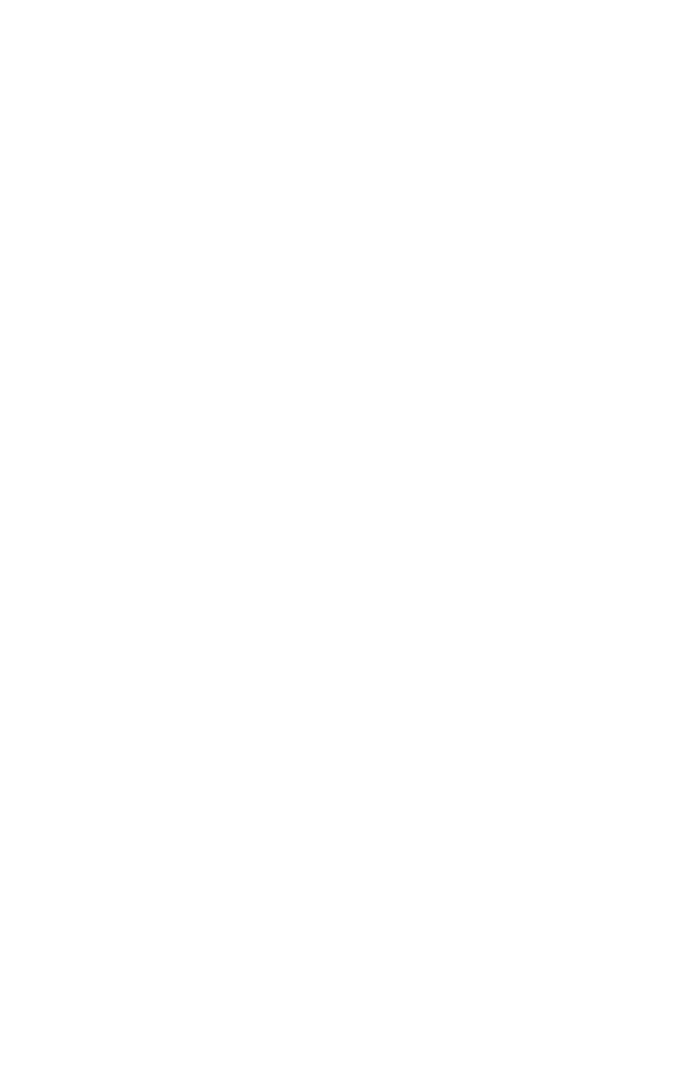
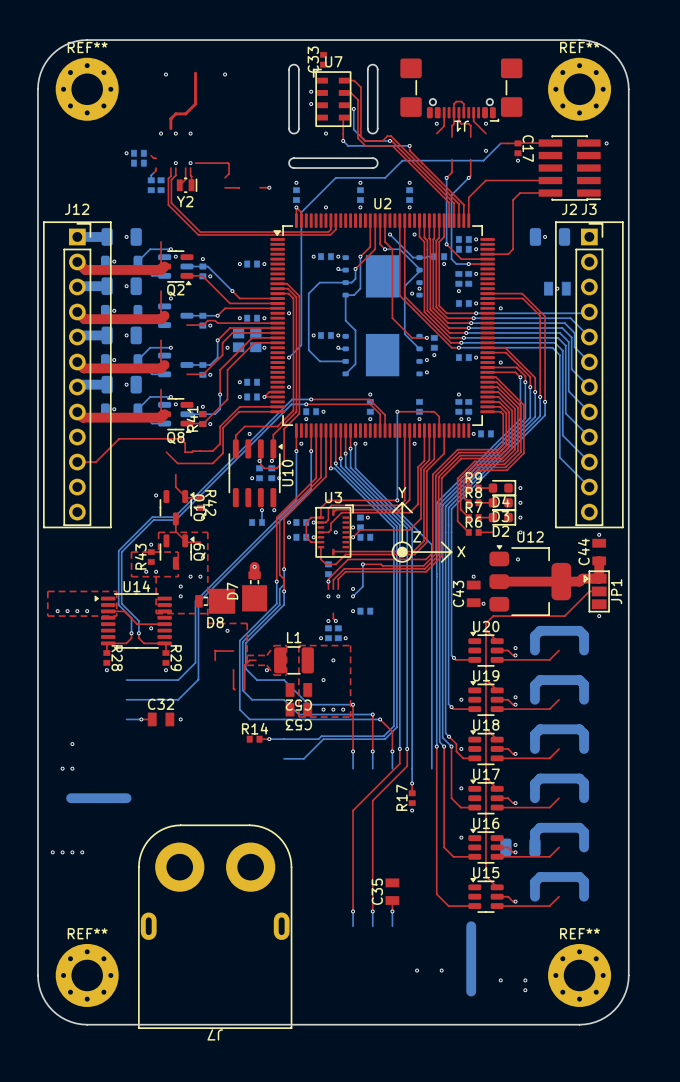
board edge: none -> (87, 40) (579, 40) (590, 41) (605, 47) (618, 58) (623, 67) (628, 89) (628, 975) (627, 986) (621, 1001) (614, 1010) (600, 1019) (579, 1024) (87, 1024) (70, 1021) (61, 1017) (52, 1010) (42, 996) (37, 975) (37, 89) (40, 73) (52, 54) (70, 42) (87, 40)
C33: none -> (323, 59)
board edge: none -> (289, 69) (289, 129) (294, 133) (298, 129) (298, 68) (293, 64) (289, 69)
board edge: none -> (367, 69) (367, 129) (373, 133) (377, 129) (377, 68) (372, 64) (367, 69)
top track: none -> (195, 73) (195, 104) (185, 113) (175, 113) (170, 118) (170, 128)
via: none -> (165, 74)
via: none -> (225, 74)
top track: none -> (344, 80) (354, 80) (360, 87) (360, 136) (365, 140) (382, 140) (387, 136) (391, 136) (458, 203) (458, 220)
REF**: none -> (87, 89)
REF**: none -> (579, 89)
J1: none -> (461, 90)
via: none -> (311, 91)
top track: none -> (344, 92) (351, 92) (357, 99) (357, 138) (365, 145) (392, 145) (449, 202) (449, 220)
U7: none -> (332, 97)
via: none -> (311, 104)
bottom track: none -> (353, 108) (353, 129) (365, 140) (389, 140)
via: none -> (353, 108)
top track: none -> (444, 112) (444, 126) (436, 133)
top track: none -> (458, 112) (458, 121) (470, 125) (470, 137)
top track: none -> (463, 112) (463, 104) (461, 101) (456, 101) (453, 104) (452, 137)
top track: none -> (473, 112) (473, 121) (485, 133)
top track: none -> (344, 117) (343, 140)
via: none -> (436, 123)
via: none -> (485, 123)
via: none -> (161, 133)
via: none -> (175, 133)
via: none -> (190, 133)
via: none -> (325, 133)
bottom track: none -> (343, 140) (348, 145) (409, 145)
via: none -> (343, 140)
top track: none -> (389, 140) (453, 203) (453, 220)
via: none -> (389, 140)
bottom track: none -> (500, 143) (483, 160) (402, 160) (385, 177) (335, 177) (301, 212) (301, 345) (289, 357)
top track: none -> (550, 143) (500, 143)
via: none -> (606, 143)
top track: none -> (409, 145) (409, 150) (463, 204) (463, 220)
via: none -> (409, 145)
C17: none -> (517, 148)
via: none -> (485, 150)
via: none -> (126, 153)
part: none -> (138, 153)
top track: none -> (151, 155) (156, 158)
board edge: none -> (293, 158) (372, 158) (377, 163) (372, 168) (293, 168) (289, 163) (293, 158)
top track: none -> (452, 159) (452, 172) (446, 177)
top track: none -> (470, 159) (470, 175) (468, 177)
via: none -> (517, 160)
part: none -> (138, 163)
via: none -> (175, 163)
via: none -> (190, 163)
top track: none -> (195, 163) (228, 163) (228, 173) (225, 177)
top track: none -> (156, 168) (153, 172)
top track: none -> (170, 168) (170, 176) (168, 178) (168, 204) (198, 234) (330, 234) (335, 229) (335, 220)
top track: none -> (175, 168) (175, 175) (171, 179) (171, 202) (200, 232) (328, 232) (330, 229) (330, 220)
top track: none -> (185, 168) (185, 179) (179, 185)
top track: none -> (190, 168) (191, 185)
J2: none -> (569, 168)
bottom track: none -> (153, 172) (151, 175) (151, 180)
bottom track: none -> (446, 177) (446, 244)
via: none -> (446, 177)
bottom track: none -> (468, 177) (451, 195) (451, 259) (456, 264) (468, 264)
via: none -> (468, 177)
top track: none -> (550, 180) (485, 180) (468, 197) (468, 220)
via: none -> (296, 182)
via: none -> (360, 182)
via: none -> (409, 182)
part: none -> (151, 185)
part: none -> (161, 185)
Y2: none -> (186, 185)
top track: none -> (225, 187) (239, 187)
top track: none -> (260, 187) (269, 187)
via: none -> (269, 187)
top track: none -> (550, 193) (520, 193) (513, 200) (513, 249) (508, 254) (487, 254)
part: none -> (296, 195)
part: none -> (360, 195)
part: none -> (409, 195)
via: none -> (296, 207)
via: none -> (325, 207)
via: none -> (360, 207)
via: none -> (409, 207)
top track: none -> (296, 220) (296, 207) (301, 212) (301, 220)
top track: none -> (370, 220) (370, 246) (360, 256)
top track: none -> (375, 220) (375, 249) (355, 268)
top track: none -> (380, 220) (380, 244) (385, 249)
top track: none -> (385, 220) (385, 241) (392, 249) (392, 318) (412, 337) (426, 337)
top track: none -> (399, 220) (399, 295) (451, 347) (458, 347)
top track: none -> (404, 220) (404, 296) (451, 342) (461, 342)
top track: none -> (419, 220) (419, 236) (424, 241) (424, 312) (450, 337) (463, 337)
top track: none -> (424, 220) (424, 237) (427, 240) (427, 310) (449, 332) (466, 332)
top track: none -> (429, 220) (430, 309) (448, 328) (468, 328)
top track: none -> (434, 220) (433, 308) (448, 323) (471, 323)
top track: none -> (439, 220) (439, 237) (436, 240) (436, 307) (447, 318) (473, 318)
top track: none -> (444, 220) (444, 236) (439, 241) (439, 305) (446, 313) (476, 313)
line: none -> (43, 222) (110, 222) (110, 527) (43, 527) (43, 222)
line: none -> (555, 222) (622, 222) (622, 527) (555, 527) (555, 222)
bottom track: none -> (389, 234) (413, 257) (434, 256)
via: none -> (389, 234)
via: none -> (414, 234)
bottom track: none -> (77, 236) (107, 236)
part: none -> (121, 236)
via: none -> (126, 236)
via: none -> (545, 236)
part: none -> (549, 236)
part: none -> (463, 239)
via: none -> (476, 239)
top track: none -> (161, 241) (161, 262) (164, 266) (161, 269) (85, 269) (77, 261)
top track: none -> (446, 244) (461, 259) (487, 259)
via: none -> (446, 244)
bottom track: none -> (170, 249) (150, 249) (137, 261) (152, 275) (164, 275)
via: none -> (170, 249)
bottom track: none -> (385, 249) (399, 249) (419, 268) (419, 271) (404, 286) (404, 334) (419, 348)
via: none -> (385, 249)
part: none -> (463, 249)
via: none -> (476, 249)
via: none -> (175, 256)
via: none -> (313, 256)
part: none -> (325, 256)
via: none -> (338, 256)
bottom track: none -> (360, 256) (360, 288) (353, 295) (345, 295) (345, 320) (355, 330) (355, 364) (345, 373)
via: none -> (360, 256)
part: none -> (439, 256)
via: none -> (202, 259)
via: none -> (114, 261)
part: none -> (121, 261)
via: none -> (239, 264)
part: none -> (252, 264)
via: none -> (264, 264)
via: none -> (444, 264)
top track: none -> (468, 264) (487, 264)
via: none -> (468, 264)
part: none -> (175, 266)
bottom track: none -> (187, 266) (207, 266) (232, 291)
Q2: none -> (175, 267)
bottom track: none -> (338, 268) (345, 270)
via: none -> (338, 268)
bottom track: none -> (355, 268) (355, 278) (351, 282) (319, 282) (308, 293) (308, 350) (319, 361) (345, 361)
via: none -> (355, 268)
part: none -> (202, 271)
via: none -> (476, 273)
top track: none -> (187, 275) (202, 275) (229, 303) (277, 303)
via: none -> (210, 276)
part: none -> (382, 276)
part: none -> (458, 278)
part: none -> (468, 278)
top track: none -> (277, 283) (287, 283) (299, 296) (299, 413) (284, 428) (284, 460) (276, 468) (264, 468) (260, 464) (260, 448)
bottom track: none -> (107, 286) (77, 286)
part: none -> (121, 286)
via: none -> (126, 286)
top track: none -> (277, 288) (287, 288) (296, 297) (296, 411) (273, 434) (271, 460)
via: none -> (419, 288)
part: none -> (557, 288)
via: none -> (557, 288)
top track: none -> (161, 291) (161, 312) (164, 315) (161, 319) (84, 319) (77, 312)
top track: none -> (232, 291) (239, 298) (277, 298)
via: none -> (232, 291)
via: none -> (458, 291)
top track: none -> (277, 293) (288, 293) (293, 298) (293, 410) (277, 426) (244, 426) (235, 435) (235, 448)
via: none -> (412, 293)
top track: none -> (487, 293) (522, 293) (545, 316) (545, 401)
via: none -> (170, 298)
top track: none -> (487, 298) (522, 298) (540, 315) (540, 396)
part: none -> (463, 303)
via: none -> (476, 303)
top track: none -> (277, 308) (225, 308) (217, 315)
via: none -> (500, 308)
via: none -> (114, 310)
part: none -> (121, 310)
bottom track: none -> (589, 312) (476, 313)
via: none -> (289, 313)
via: none -> (476, 313)
part: none -> (175, 315)
bottom track: none -> (187, 315) (217, 315)
via: none -> (217, 315)
via: none -> (239, 318)
part: none -> (252, 318)
via: none -> (264, 318)
bottom track: none -> (473, 318) (570, 318) (589, 337)
via: none -> (473, 318)
part: none -> (202, 320)
top track: none -> (277, 323) (217, 323) (215, 320) (207, 320) (202, 325) (187, 325)
bottom track: none -> (471, 323) (564, 323) (574, 332) (574, 347) (589, 362)
via: none -> (471, 323)
via: none -> (210, 325)
U2: none -> (382, 325)
top track: none -> (277, 328) (229, 328) (217, 340)
bottom track: none -> (468, 328) (562, 328) (571, 337) (571, 369) (589, 387)
via: none -> (468, 328)
top track: none -> (277, 332) (232, 332) (222, 342) (222, 355) (202, 374) (187, 374)
bottom track: none -> (466, 332) (559, 332) (568, 341) (568, 391) (589, 412)
via: none -> (466, 332)
bottom track: none -> (107, 335) (77, 337)
part: none -> (121, 335)
via: none -> (126, 335)
via: none -> (313, 335)
part: none -> (325, 335)
via: none -> (338, 335)
top track: none -> (277, 337) (252, 337) (220, 369) (220, 394)
via: none -> (426, 337)
bottom track: none -> (463, 337) (557, 337) (565, 345) (565, 413) (589, 437)
via: none -> (463, 337)
top track: none -> (161, 340) (161, 361) (164, 364) (161, 368) (83, 368) (77, 362)
bottom track: none -> (217, 340) (217, 357) (210, 364) (187, 364)
via: none -> (217, 340)
part: none -> (247, 340)
top track: none -> (277, 342) (254, 342) (227, 369) (227, 399) (202, 424) (187, 423)
part: none -> (434, 342)
bottom track: none -> (461, 342) (554, 342) (562, 350) (562, 435) (589, 462)
via: none -> (461, 342)
bottom track: none -> (170, 347) (150, 347) (137, 360) (152, 374) (164, 374)
via: none -> (170, 347)
via: none -> (227, 347)
via: none -> (264, 347)
bottom track: none -> (338, 347) (345, 348)
via: none -> (338, 347)
bottom track: none -> (458, 347) (552, 347) (559, 355) (559, 457) (589, 487)
via: none -> (458, 347)
top track: none -> (487, 347) (505, 347) (535, 377) (535, 392)
top track: none -> (487, 352) (505, 352) (530, 377) (530, 387)
part: none -> (382, 355)
via: none -> (434, 355)
via: none -> (289, 357)
part: none -> (463, 357)
via: none -> (476, 357)
via: none -> (114, 360)
part: none -> (121, 360)
via: none -> (426, 360)
via: none -> (500, 362)
part: none -> (175, 364)
top track: none -> (487, 367) (516, 367) (525, 376) (525, 382)
part: none -> (202, 369)
via: none -> (426, 372)
top track: none -> (487, 372) (515, 372) (520, 377)
J12: none -> (77, 374)
via: none -> (210, 374)
J3: none -> (589, 374)
top track: none -> (487, 377) (496, 377) (523, 405) (523, 453) (506, 470) (479, 470) (468, 480) (468, 488)
bottom track: none -> (520, 377) (520, 419) (436, 502) (436, 746)
via: none -> (520, 377)
via: none -> (239, 382)
part: none -> (252, 382)
top track: none -> (487, 382) (496, 382) (520, 406) (520, 452) (505, 467) (477, 467) (463, 480) (463, 497) (468, 502)
bottom track: none -> (525, 382) (525, 418) (439, 504) (439, 742) (444, 746)
via: none -> (525, 382)
bottom track: none -> (107, 384) (79, 384) (77, 387)
part: none -> (121, 384)
via: none -> (126, 384)
via: none -> (289, 387)
top track: none -> (487, 387) (497, 387) (517, 407) (517, 450) (504, 464) (475, 464) (460, 479) (460, 509) (468, 517)
bottom track: none -> (530, 387) (530, 417) (442, 505) (442, 737) (451, 746)
via: none -> (530, 387)
top track: none -> (161, 389) (161, 410) (164, 414) (161, 417) (82, 417) (77, 412)
top track: none -> (277, 392) (269, 392) (264, 396) (277, 396)
top track: none -> (487, 392) (498, 392) (515, 408) (515, 449) (503, 461) (474, 461) (457, 478) (457, 521) (468, 532)
bottom track: none -> (535, 392) (535, 416) (445, 506) (445, 733) (449, 736)
via: none -> (535, 392)
bottom track: none -> (220, 394) (220, 409) (215, 414) (187, 414)
via: none -> (220, 394)
via: none -> (370, 394)
via: none -> (458, 394)
bottom track: none -> (170, 396) (150, 396) (137, 409) (152, 423) (164, 423)
via: none -> (170, 396)
via: none -> (239, 396)
part: none -> (252, 396)
via: none -> (264, 396)
top track: none -> (487, 396) (498, 396) (512, 410) (512, 448) (501, 458) (461, 458) (441, 478) (441, 556) (426, 571) (345, 571) (338, 579) (338, 589)
bottom track: none -> (540, 396) (540, 416) (448, 507) (448, 704) (451, 707)
via: none -> (540, 396)
top track: none -> (311, 399) (369, 399) (385, 414) (385, 430)
bottom track: none -> (311, 399) (292, 399) (174, 517) (152, 517) (118, 550) (118, 604) (131, 617) (131, 633)
via: none -> (311, 399)
top track: none -> (487, 401) (499, 401) (509, 411) (509, 447) (500, 455) (460, 455) (438, 476) (438, 555) (424, 568) (344, 568) (333, 579) (333, 589)
bottom track: none -> (545, 401) (545, 415) (451, 508) (451, 655) (453, 657)
via: none -> (545, 401)
via: none -> (175, 404)
top track: none -> (306, 404) (370, 404) (380, 414) (380, 430)
bottom track: none -> (306, 404) (291, 404) (175, 520) (153, 520) (121, 552) (121, 603) (138, 620) (138, 633)
via: none -> (306, 404)
via: none -> (202, 406)
top track: none -> (277, 406) (239, 406) (220, 426) (220, 443) (212, 451) (185, 452) (185, 443) (180, 438) (119, 438) (95, 462) (77, 462)
part: none -> (370, 406)
part: none -> (419, 406)
part: none -> (458, 406)
part: none -> (468, 406)
top track: none -> (487, 406) (500, 406) (506, 412) (506, 445) (499, 452) (458, 452) (435, 475) (435, 553) (423, 565) (362, 564)
via: none -> (114, 409)
part: none -> (121, 409)
top track: none -> (277, 411) (239, 411) (223, 427) (223, 453) (212, 463) (177, 463) (166, 452)
part: none -> (311, 411)
via: none -> (323, 411)
top track: none -> (397, 411) (434, 411) (439, 416) (439, 430)
bottom track: none -> (397, 411) (397, 500)
via: none -> (397, 411)
top track: none -> (487, 411) (500, 411) (503, 414) (503, 444) (498, 449) (457, 449) (432, 474) (432, 552) (425, 559) (348, 559) (328, 579) (328, 589)
part: none -> (175, 414)
Q8: none -> (175, 415)
R41: none -> (202, 419)
via: none -> (306, 419)
via: none -> (370, 419)
via: none -> (419, 419)
via: none -> (461, 419)
via: none -> (468, 419)
via: none -> (210, 424)
top track: none -> (296, 430) (296, 451)
top track: none -> (311, 430) (311, 451)
top track: none -> (316, 430) (316, 478) (276, 517) (276, 581)
top track: none -> (321, 430) (321, 477) (279, 518) (279, 574) (284, 579) (284, 591)
top track: none -> (325, 430) (325, 476) (284, 518) (284, 569)
top track: none -> (330, 430) (330, 468)
top track: none -> (335, 430) (335, 463)
top track: none -> (340, 430) (340, 458)
top track: none -> (345, 430) (345, 453)
top track: none -> (350, 430) (350, 448)
top track: none -> (404, 430) (404, 500) (399, 505) (331, 505) (328, 508) (328, 519) (325, 522) (313, 522)
top track: none -> (409, 430) (409, 499) (399, 509) (336, 509) (333, 512)
top track: none -> (424, 430) (424, 460) (418, 467) (418, 504) (409, 512) (341, 512) (330, 523) (330, 529) (328, 532) (320, 532)
top track: none -> (429, 430) (429, 460) (421, 468) (421, 518) (409, 529) (360, 529) (353, 537) (345, 537)
top track: none -> (434, 430) (434, 459) (423, 469) (423, 540) (413, 551) (333, 552)
top track: none -> (444, 430) (444, 453) (426, 470) (426, 542) (414, 554) (345, 554) (335, 564) (325, 564) (320, 559) (320, 547)
via: none -> (249, 433)
via: none -> (473, 433)
part: none -> (485, 433)
via: none -> (301, 443)
bottom track: none -> (355, 443) (355, 468) (431, 544) (431, 768)
via: none -> (355, 443)
via: none -> (365, 443)
via: none -> (414, 443)
bottom track: none -> (350, 448) (350, 467) (412, 529) (412, 783)
via: none -> (350, 448)
bottom track: none -> (296, 451) (296, 500) (195, 601) (195, 662) (178, 680) (126, 680)
via: none -> (296, 451)
bottom track: none -> (311, 451) (311, 489) (198, 602) (198, 679) (178, 699) (126, 699)
via: none -> (311, 451)
bottom track: none -> (345, 453) (345, 466) (407, 528) (407, 748)
via: none -> (345, 453)
bottom track: none -> (340, 458) (340, 466) (399, 525) (399, 748)
via: none -> (340, 458)
via: none -> (259, 460)
via: none -> (271, 460)
bottom track: none -> (335, 463) (396, 526) (396, 727) (385, 739) (323, 739) (303, 758) (284, 758)
via: none -> (335, 463)
bottom track: none -> (330, 468) (334, 468) (393, 527) (393, 726) (383, 736) (321, 736) (318, 739) (269, 739)
via: none -> (330, 468)
U10: none -> (255, 473)
part: none -> (259, 473)
part: none -> (271, 473)
top track: none -> (175, 474) (175, 487) (186, 497) (200, 497)
via: none -> (252, 478)
via: none -> (279, 478)
R9: none -> (473, 488)
top track: none -> (478, 488) (493, 488)
D4: none -> (502, 488)
via: none -> (520, 488)
via: none -> (156, 495)
top track: none -> (397, 500) (328, 500) (320, 507) (320, 517) (311, 517) (306, 522) (306, 537) (311, 542) (320, 542)
via: none -> (397, 500)
R42: none -> (200, 502)
drawing: none -> [391, 502, 453, 563]
R8: none -> (473, 502)
top track: none -> (478, 502) (493, 502)
D3: none -> (502, 502)
via: none -> (520, 502)
Q10: none -> (177, 507)
bottom track: none -> (261, 510) (261, 522)
via: none -> (261, 510)
via: none -> (274, 510)
via: none -> (367, 517)
R7: none -> (473, 517)
top track: none -> (478, 517) (493, 517)
D2: none -> (502, 517)
via: none -> (520, 517)
top track: none -> (175, 518) (175, 531) (186, 542) (200, 542)
part: none -> (257, 522)
via: none -> (289, 522)
part: none -> (301, 522)
via: none -> (313, 522)
part: none -> (360, 522)
via: none -> (353, 527)
U3: none -> (334, 531)
via: none -> (335, 532)
R6: none -> (473, 532)
top track: none -> (478, 532) (493, 532)
via: none -> (520, 532)
via: none -> (599, 534)
via: none -> (289, 537)
part: none -> (301, 537)
via: none -> (313, 537)
via: none -> (353, 537)
part: none -> (365, 537)
via: none -> (151, 544)
top zone outline: none -> (131, 552) (178, 552) (178, 576) (131, 576) (131, 552)
top zone outline: none -> (158, 552) (158, 532) (207, 532) (207, 623) (247, 623) (247, 665) (266, 665) (274, 675) (286, 675) (286, 645) (274, 645) (266, 655) (247, 655)
Q9: none -> (177, 552)
C44: none -> (599, 552)
R43: none -> (151, 556)
via: none -> (517, 559)
top track: none -> (599, 560) (599, 578) (582, 578) (579, 581) (499, 581)
bottom track: none -> (362, 564) (362, 586) (353, 596)
via: none -> (362, 564)
top track: none -> (254, 566) (254, 575)
via: none -> (254, 566)
bottom track: none -> (284, 569) (284, 584) (279, 588) (279, 604) (242, 641) (242, 690) (252, 699) (284, 699) (298, 714) (372, 714)
via: none -> (284, 569)
part: none -> (328, 569)
via: none -> (146, 571)
via: none -> (156, 571)
top zone outline: none -> (156, 576) (156, 613) (207, 613)
via: none -> (190, 576)
via: none -> (200, 576)
via: none -> (473, 576)
U12: none -> (530, 580)
bottom track: none -> (276, 581) (276, 603) (239, 640) (239, 709) (249, 719) (380, 719)
via: none -> (276, 581)
via: none -> (328, 581)
via: none -> (180, 586)
via: none -> (353, 588)
top zone outline: none -> (47, 591) (116, 591) (116, 616) (47, 616) (47, 591)
D7: none -> (254, 591)
bottom track: none -> (284, 591) (284, 604) (245, 643) (245, 668) (257, 680) (284, 680) (308, 704) (353, 704)
via: none -> (284, 591)
JP1: none -> (596, 591)
top track: none -> (599, 591) (589, 591) (564, 616) (493, 616) (485, 623) (485, 876) (497, 887)
C43: none -> (473, 593)
via: none -> (180, 596)
via: none -> (328, 596)
via: none -> (338, 596)
via: none -> (353, 596)
D8: none -> (215, 601)
via: none -> (483, 603)
via: none -> (57, 611)
via: none -> (67, 611)
via: none -> (77, 611)
via: none -> (87, 611)
top track: none -> (108, 611) (124, 611) (137, 624) (164, 624)
via: none -> (353, 611)
part: none -> (365, 611)
top track: none -> (333, 613) (333, 618) (335, 620)
via: none -> (599, 616)
U14: none -> (133, 620)
via: none -> (328, 620)
via: none -> (335, 620)
via: none -> (151, 628)
top track: none -> (485, 629) (497, 641)
via: none -> (227, 630)
top track: none -> (131, 633) (131, 638) (126, 643) (108, 643) (106, 652)
via: none -> (131, 633)
top track: none -> (138, 633) (138, 638) (144, 643) (164, 643) (165, 652)
via: none -> (138, 633)
part: none -> (328, 633)
part: none -> (338, 633)
via: none -> (321, 638)
via: none -> (345, 638)
top zone outline: none -> (298, 645) (350, 645) (350, 716) (298, 716) (298, 645)
via: none -> (515, 648)
U20: none -> (485, 649)
top track: none -> (497, 650) (508, 650) (515, 655)
bottom track: none -> (534, 650) (534, 636) (540, 630) (579, 630) (584, 635) (584, 650)
top track: none -> (559, 650) (549, 659) (497, 659)
top track: none -> (233, 651) (215, 650) (215, 660)
via: none -> (515, 655)
R28: none -> (106, 657)
R29: none -> (165, 657)
top track: none -> (453, 657) (455, 659) (474, 659)
via: none -> (453, 657)
top track: none -> (255, 660) (249, 660) (244, 665) (244, 689)
L1: none -> (293, 660)
via: none -> (333, 660)
top track: none -> (233, 669) (234, 689)
via: none -> (106, 670)
via: none -> (165, 670)
via: none -> (266, 670)
top track: none -> (485, 679) (497, 690)
via: none -> (323, 680)
C52: none -> (298, 689)
via: none -> (515, 697)
U19: none -> (485, 698)
via: none -> (461, 699)
top track: none -> (497, 699) (508, 699) (515, 704)
bottom track: none -> (534, 699) (534, 685) (540, 680) (579, 680) (584, 684) (584, 699)
top track: none -> (559, 699) (549, 709) (497, 709)
top track: none -> (353, 704) (353, 751)
via: none -> (353, 704)
via: none -> (515, 704)
top track: none -> (451, 707) (453, 709) (474, 709)
via: none -> (451, 707)
C53: none -> (298, 709)
via: none -> (323, 709)
via: none -> (333, 709)
via: none -> (343, 709)
top track: none -> (372, 714) (372, 751)
via: none -> (372, 714)
bottom track: none -> (126, 719) (141, 719)
top track: none -> (141, 719) (152, 719)
via: none -> (141, 719)
C32: none -> (161, 719)
via: none -> (180, 719)
top track: none -> (380, 719) (392, 731) (392, 751)
via: none -> (380, 719)
top track: none -> (485, 728) (497, 739)
top track: none -> (449, 736) (456, 744) (456, 751) (463, 758) (474, 758)
via: none -> (449, 736)
R14: none -> (254, 739)
top track: none -> (259, 739) (269, 739)
via: none -> (269, 739)
via: none -> (72, 744)
top track: none -> (436, 746) (436, 894) (448, 906) (474, 906)
via: none -> (436, 746)
top track: none -> (444, 746) (444, 847) (453, 856) (474, 856)
via: none -> (444, 746)
top track: none -> (451, 746) (451, 798) (460, 807) (474, 807)
via: none -> (451, 746)
U18: none -> (485, 747)
top track: none -> (399, 748) (399, 763) (353, 810) (353, 911)
via: none -> (399, 748)
top track: none -> (407, 748) (407, 766) (372, 800) (372, 911)
via: none -> (407, 748)
via: none -> (461, 748)
top track: none -> (497, 748) (508, 748) (515, 753)
bottom track: none -> (534, 748) (534, 734) (540, 729) (579, 729) (584, 733) (584, 748)
top track: none -> (559, 748) (549, 758) (497, 758)
bottom track: none -> (353, 751) (353, 768)
via: none -> (353, 751)
bottom track: none -> (372, 751) (372, 768)
via: none -> (372, 751)
bottom track: none -> (392, 751) (392, 768)
via: none -> (392, 751)
via: none -> (515, 753)
via: none -> (62, 768)
via: none -> (72, 768)
top track: none -> (485, 777) (497, 788)
top track: none -> (412, 783) (412, 793)
via: none -> (412, 783)
via: none -> (461, 788)
U17: none -> (485, 796)
bottom track: none -> (71, 798) (126, 798)
R17: none -> (412, 798)
top track: none -> (497, 798) (508, 798) (515, 803)
bottom track: none -> (534, 798) (534, 783) (540, 778) (579, 778) (584, 783) (584, 798)
top track: none -> (559, 798) (549, 807) (497, 807)
via: none -> (515, 803)
via: none -> (412, 810)
via: none -> (461, 837)
via: none -> (515, 845)
U16: none -> (485, 846)
top track: none -> (497, 847) (508, 847) (515, 852)
part: none -> (520, 847)
bottom track: none -> (534, 847) (534, 832) (540, 827) (579, 827) (584, 832) (584, 847)
top track: none -> (559, 847) (549, 856) (497, 856)
via: none -> (52, 852)
via: none -> (62, 852)
via: none -> (72, 852)
via: none -> (82, 852)
via: none -> (515, 852)
C35: none -> (392, 891)
U15: none -> (485, 895)
top track: none -> (497, 896) (508, 896) (515, 901)
bottom track: none -> (534, 896) (534, 882) (540, 877) (579, 877) (584, 881) (584, 896)
top track: none -> (559, 896) (549, 906) (497, 906)
top track: none -> (392, 900) (392, 911)
via: none -> (515, 901)
bottom track: none -> (353, 911) (353, 926)
via: none -> (353, 911)
bottom track: none -> (372, 911) (372, 926)
via: none -> (372, 911)
bottom track: none -> (392, 911) (392, 926)
via: none -> (392, 911)
J7: none -> (215, 926)
bottom track: none -> (471, 926) (471, 991)
via: none -> (417, 970)
via: none -> (441, 970)
REF**: none -> (87, 975)
REF**: none -> (579, 975)
via: none -> (500, 980)
via: none -> (525, 980)
via: none -> (525, 990)

